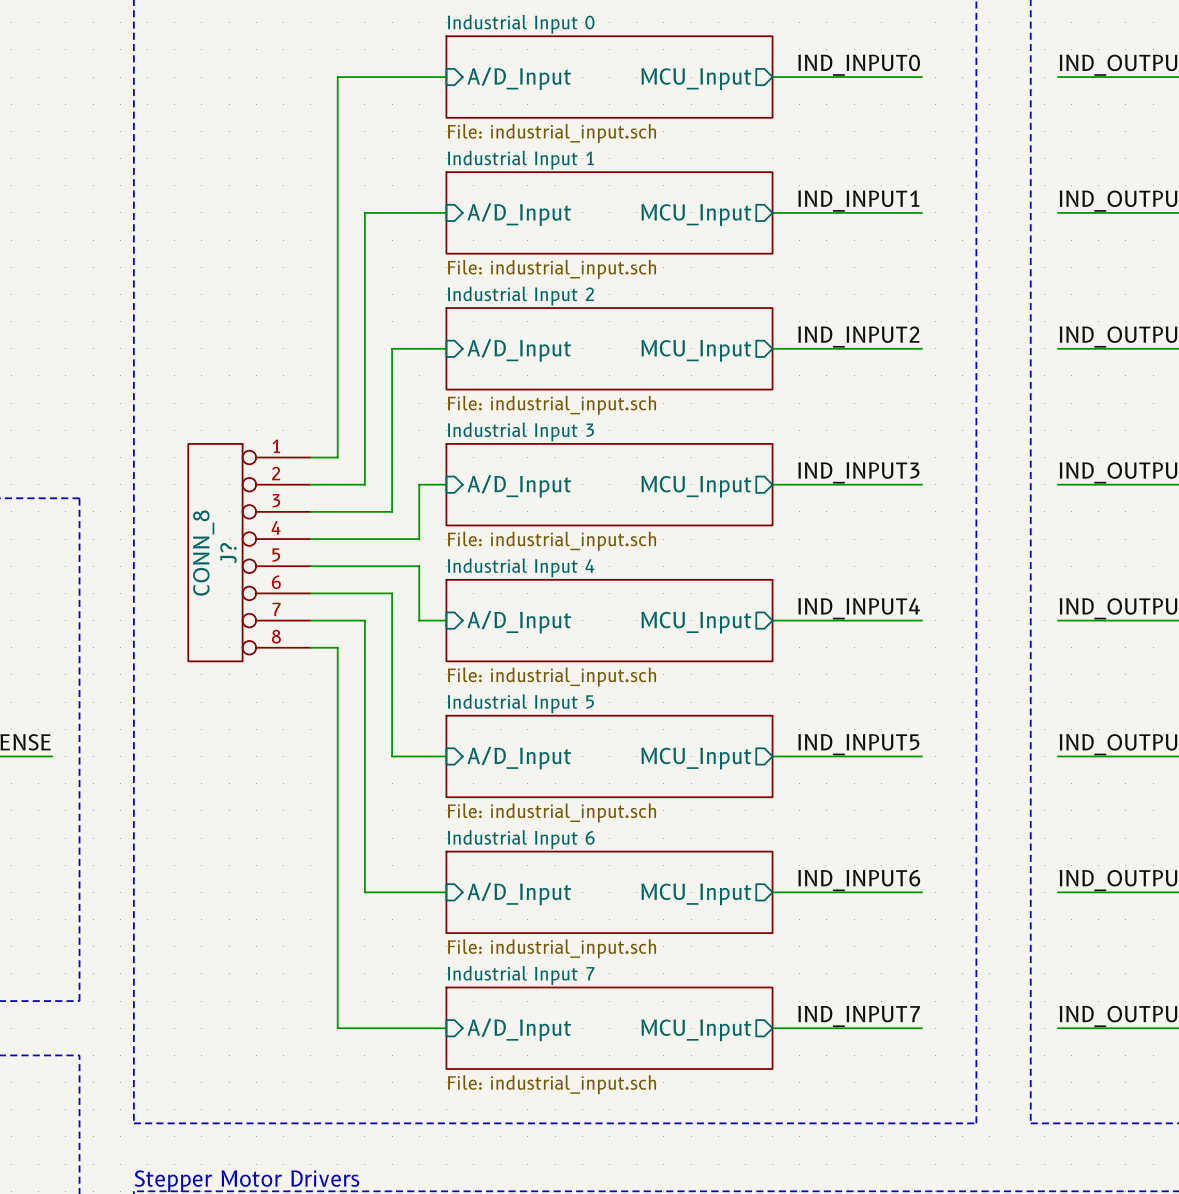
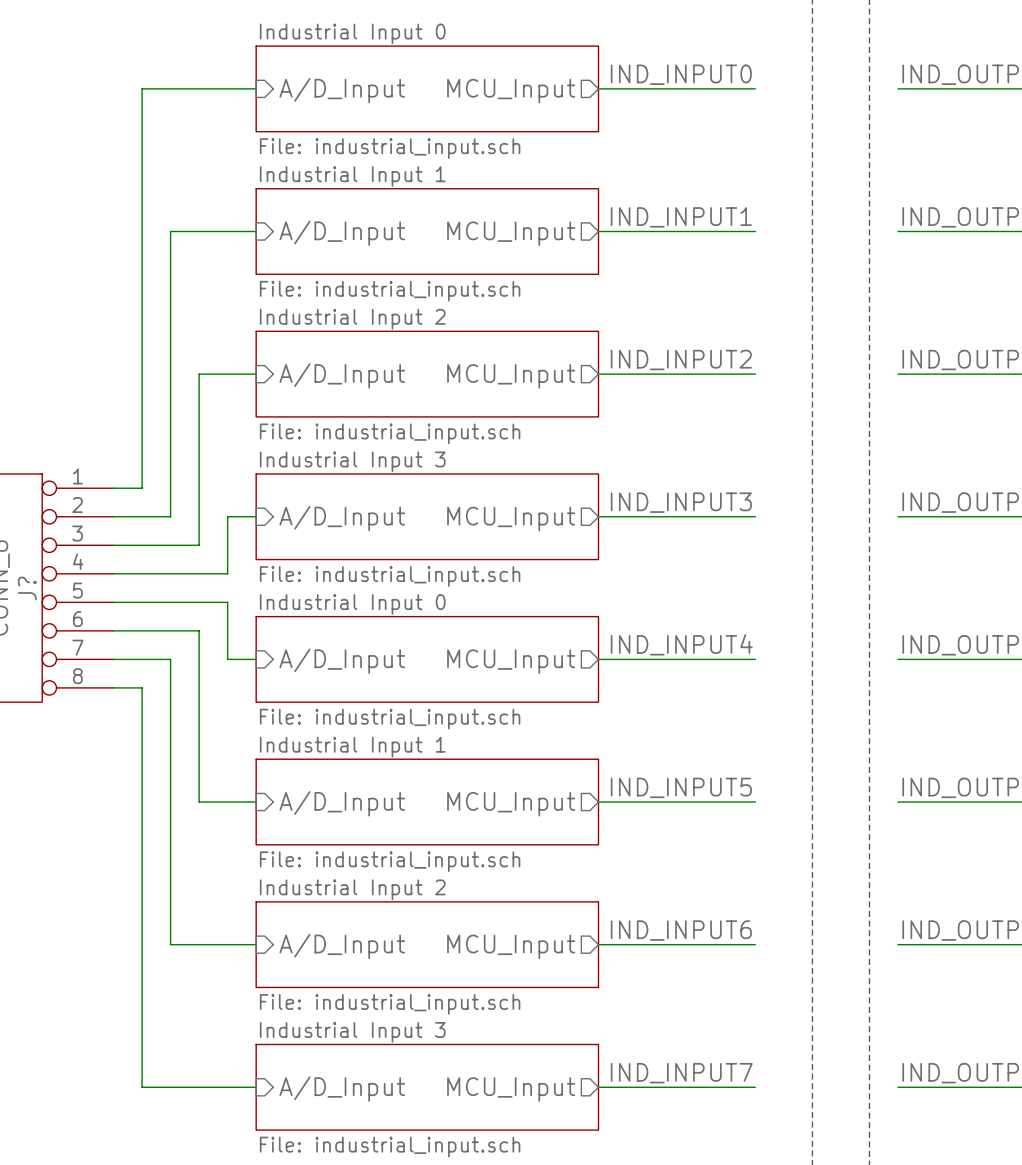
sheet Industrial Input 4 name: Industrial Input 4 (521, 567) -> Industrial Input 0 (352, 604)
sheet Industrial Input 5 name: Industrial Input 5 (520, 703) -> Industrial Input 1 (352, 747)
sheet Industrial Input 6 name: Industrial Input 6 (521, 839) -> Industrial Input 2 (352, 889)
sheet Industrial Input 7 name: Industrial Input 7 (521, 975) -> Industrial Input 3 (352, 1032)

